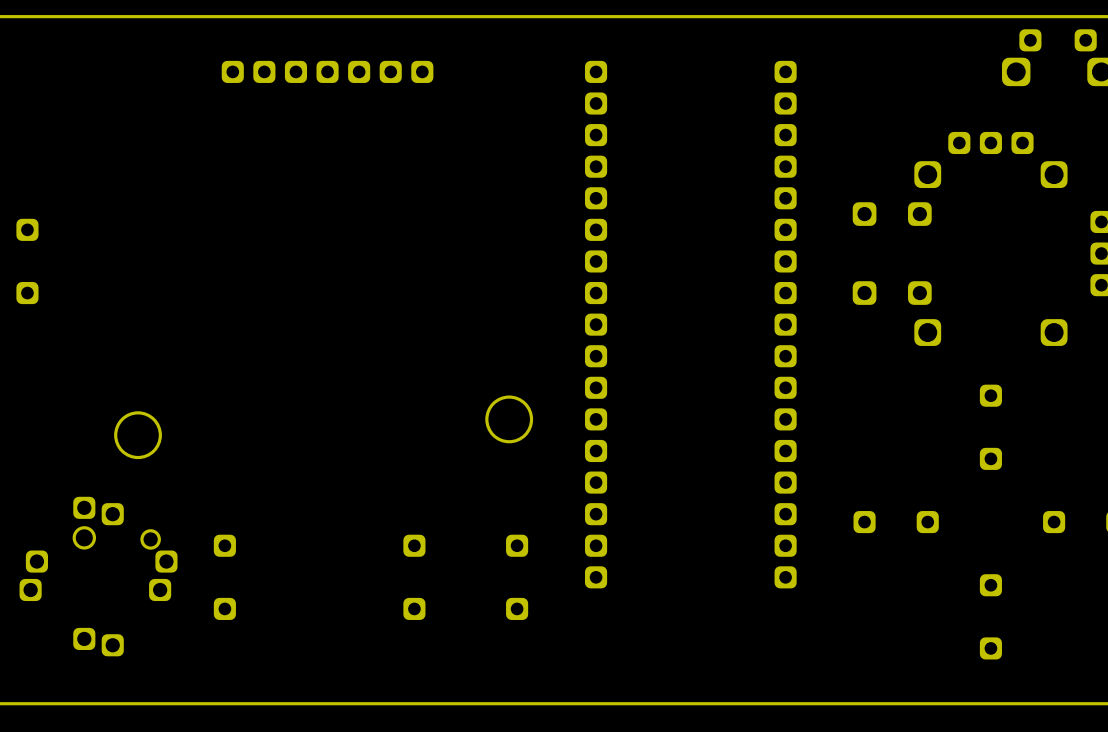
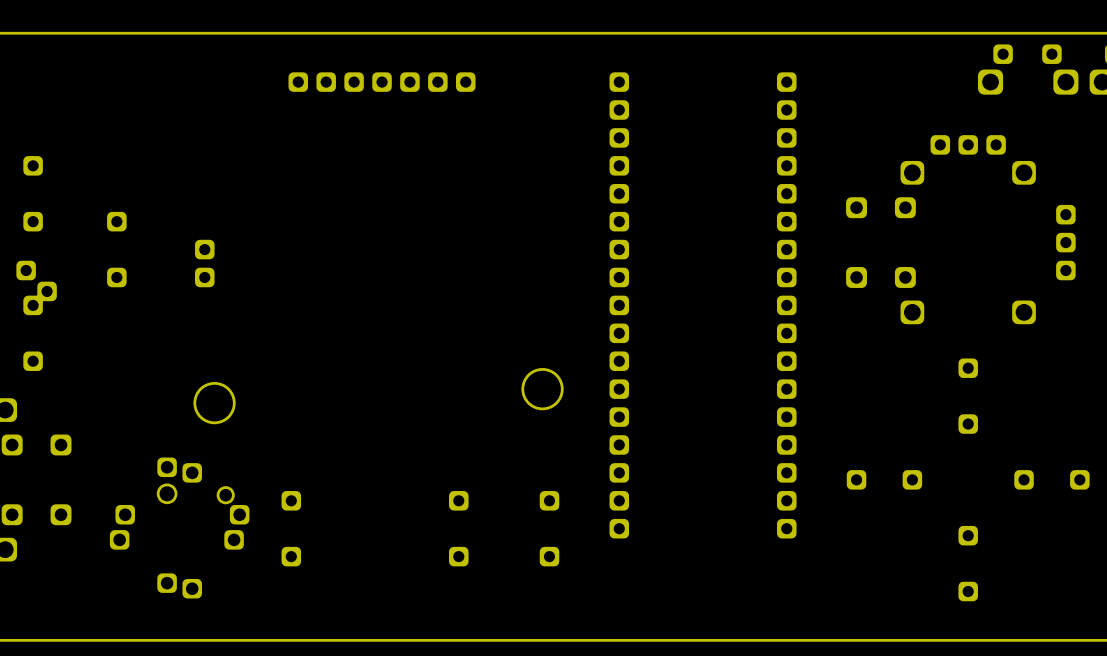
part: none -> (204, 249)
part: none -> (204, 277)

